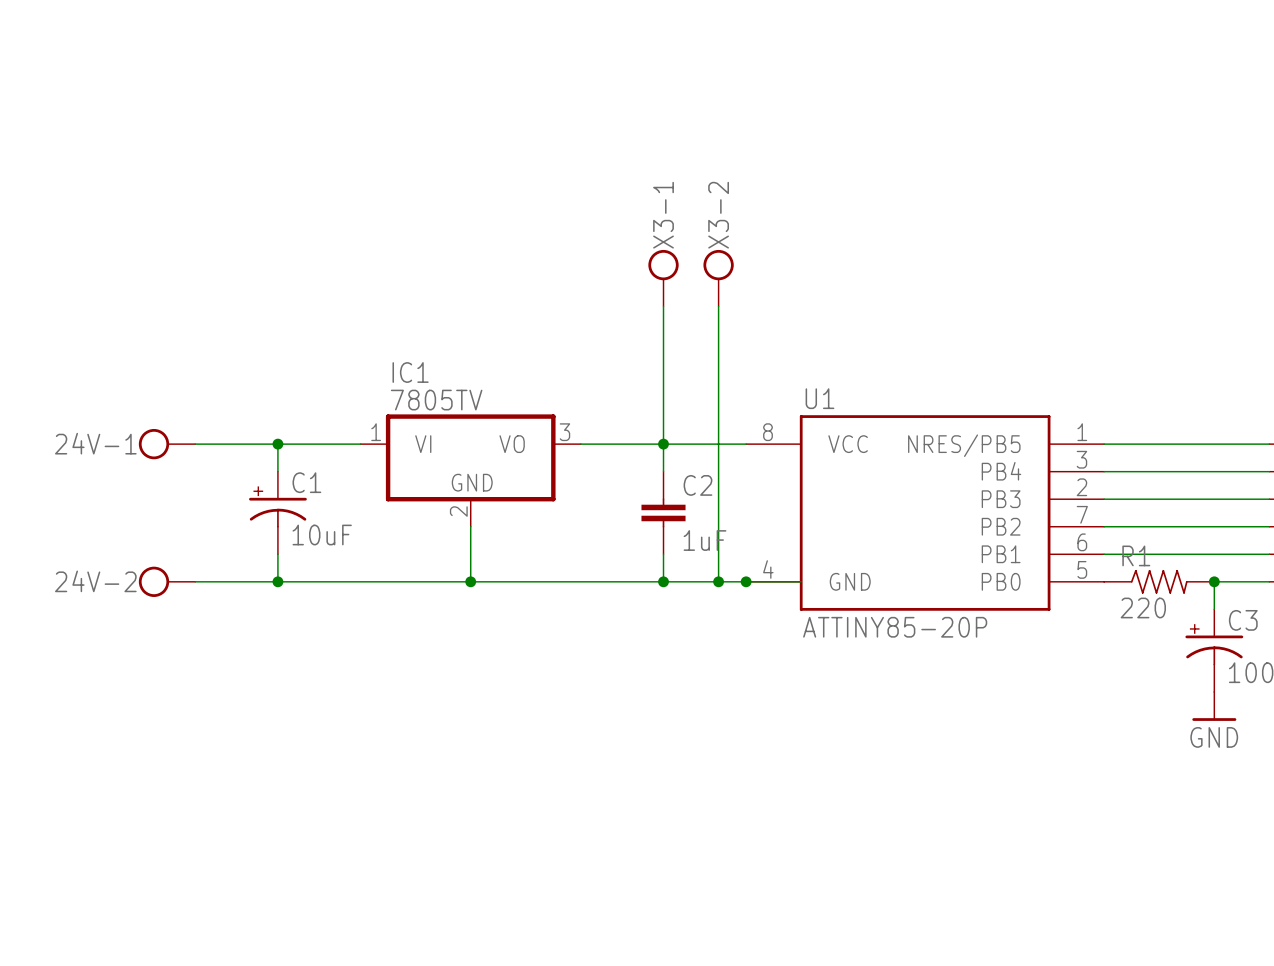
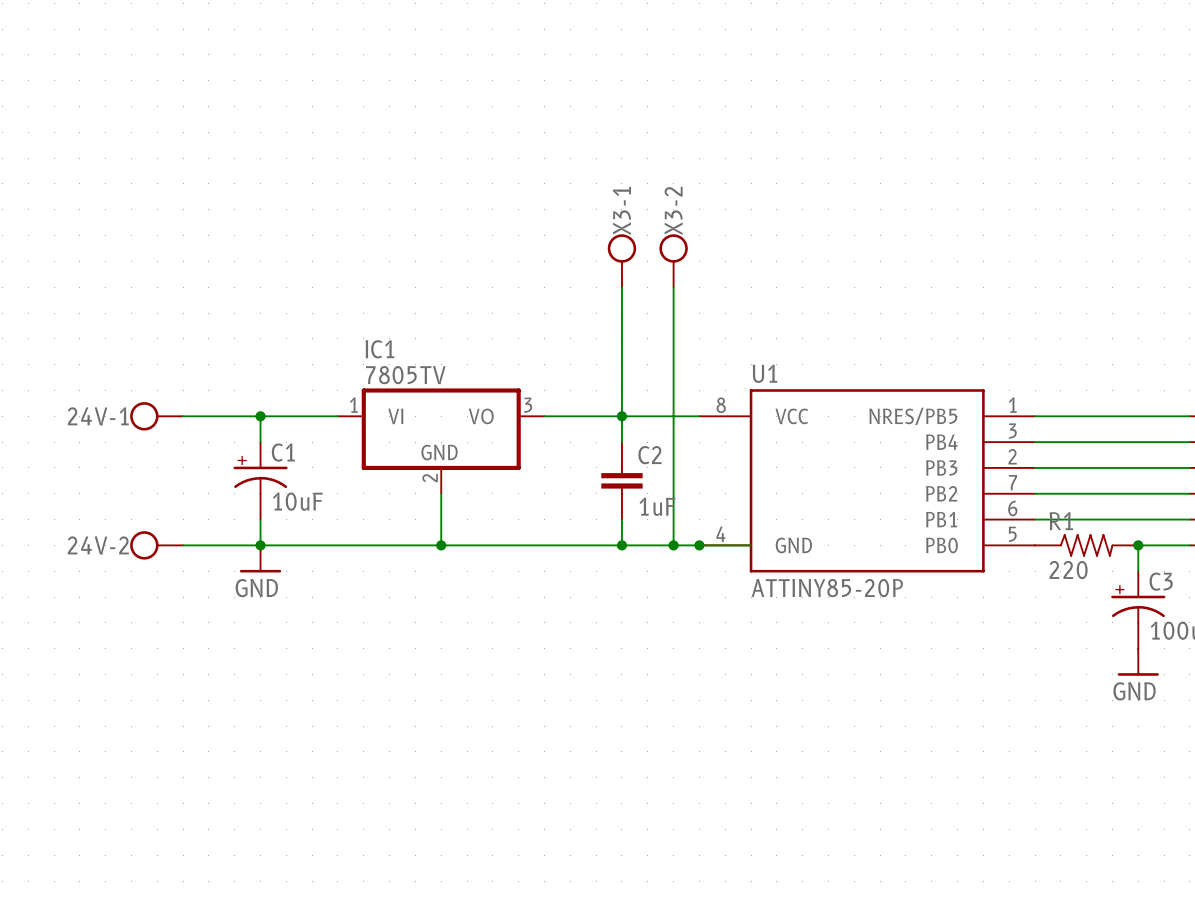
power symbol: none -> GND (260, 558)

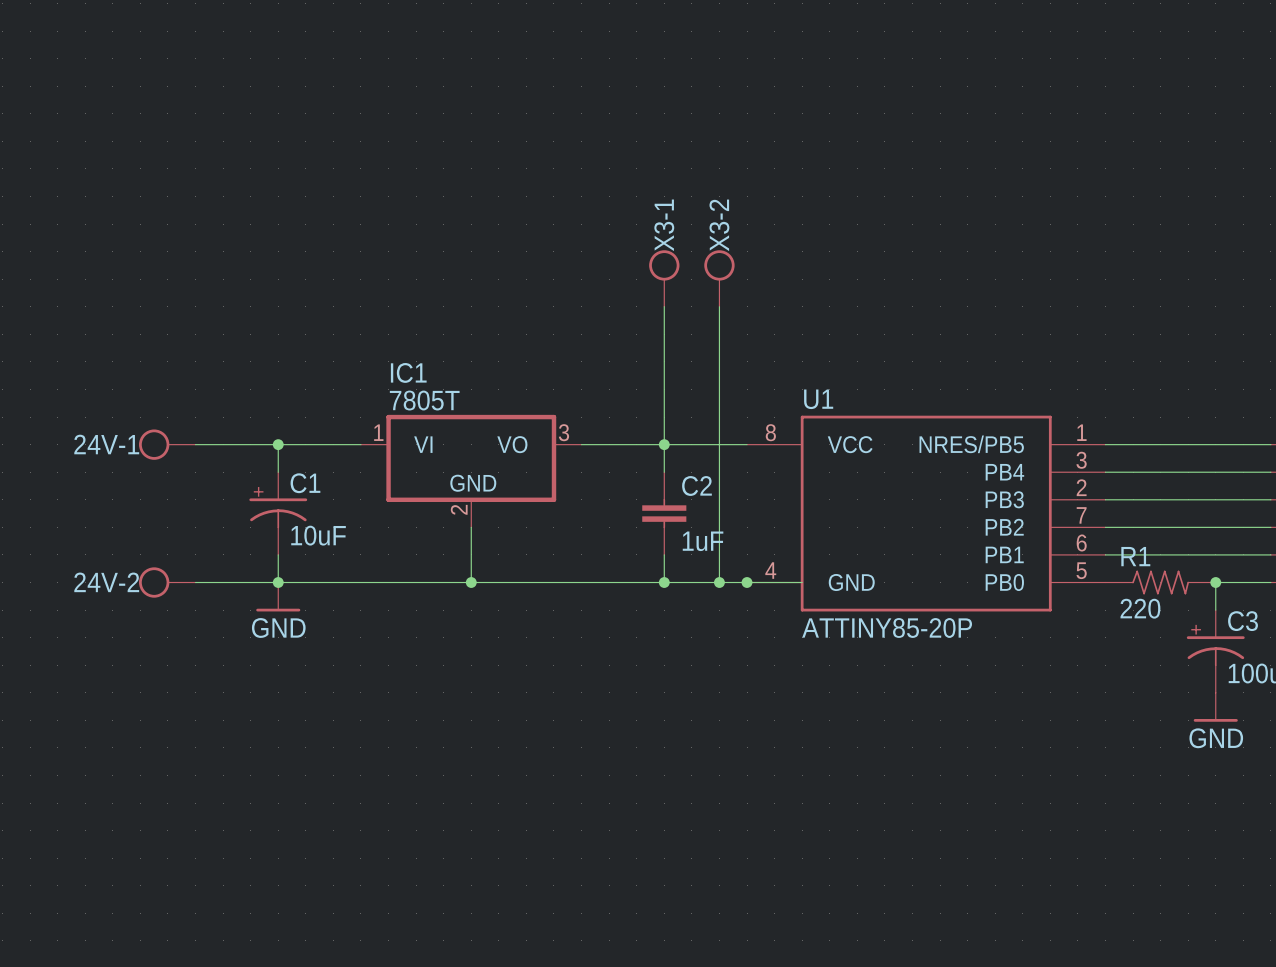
IC1 value: 7805TV (405, 375) -> 7805T (424, 400)

